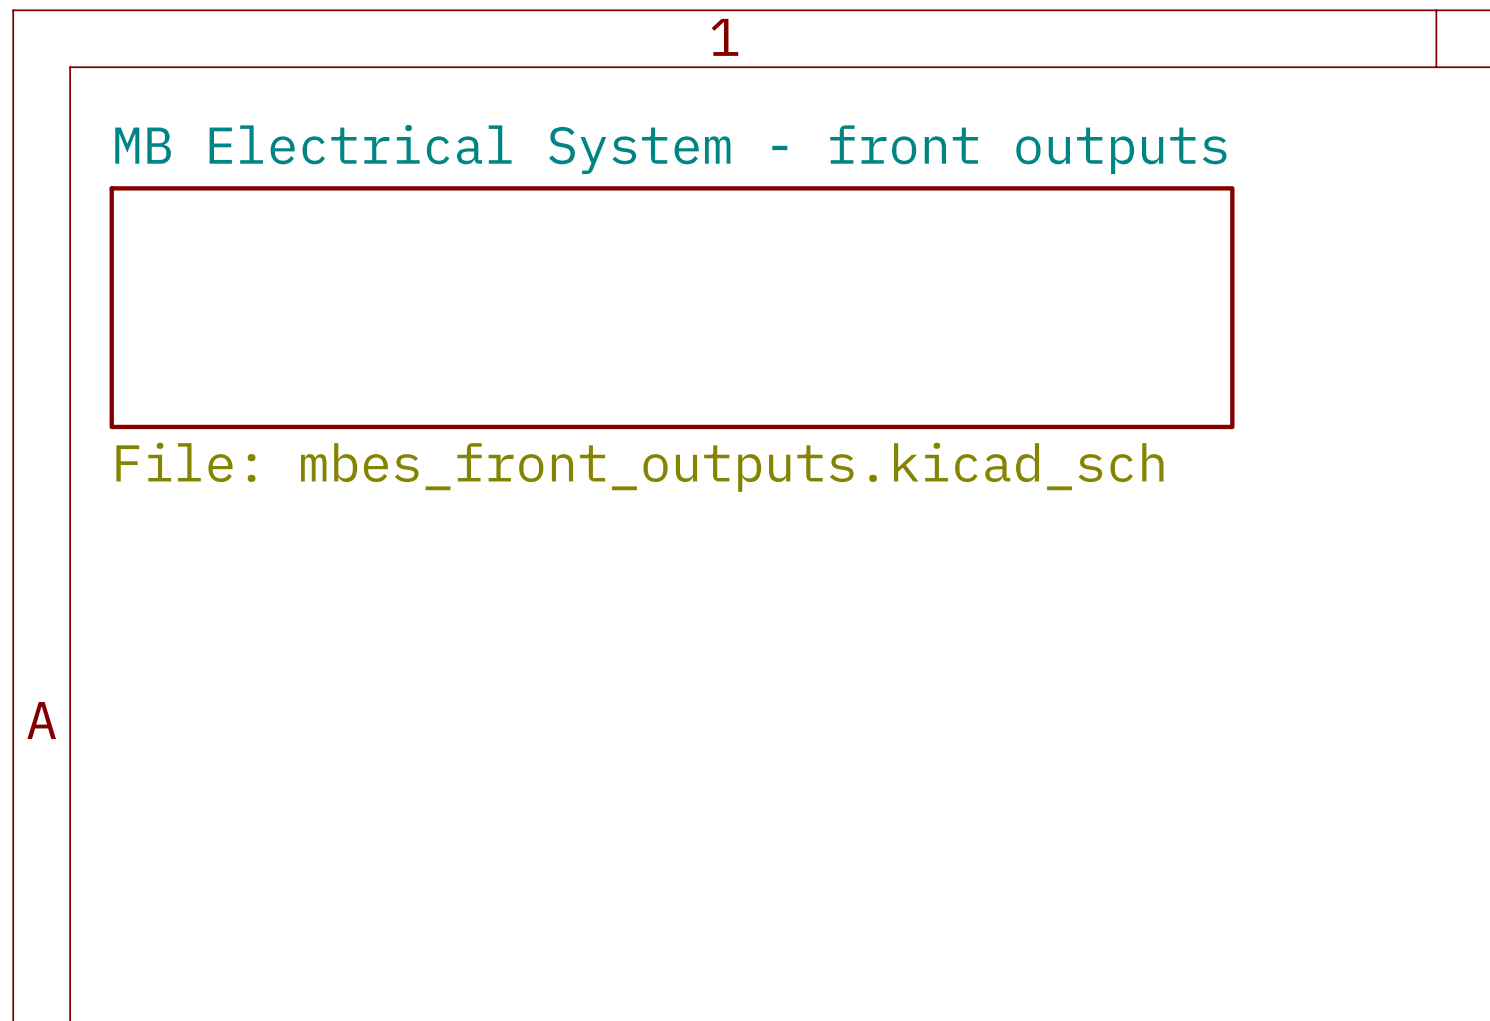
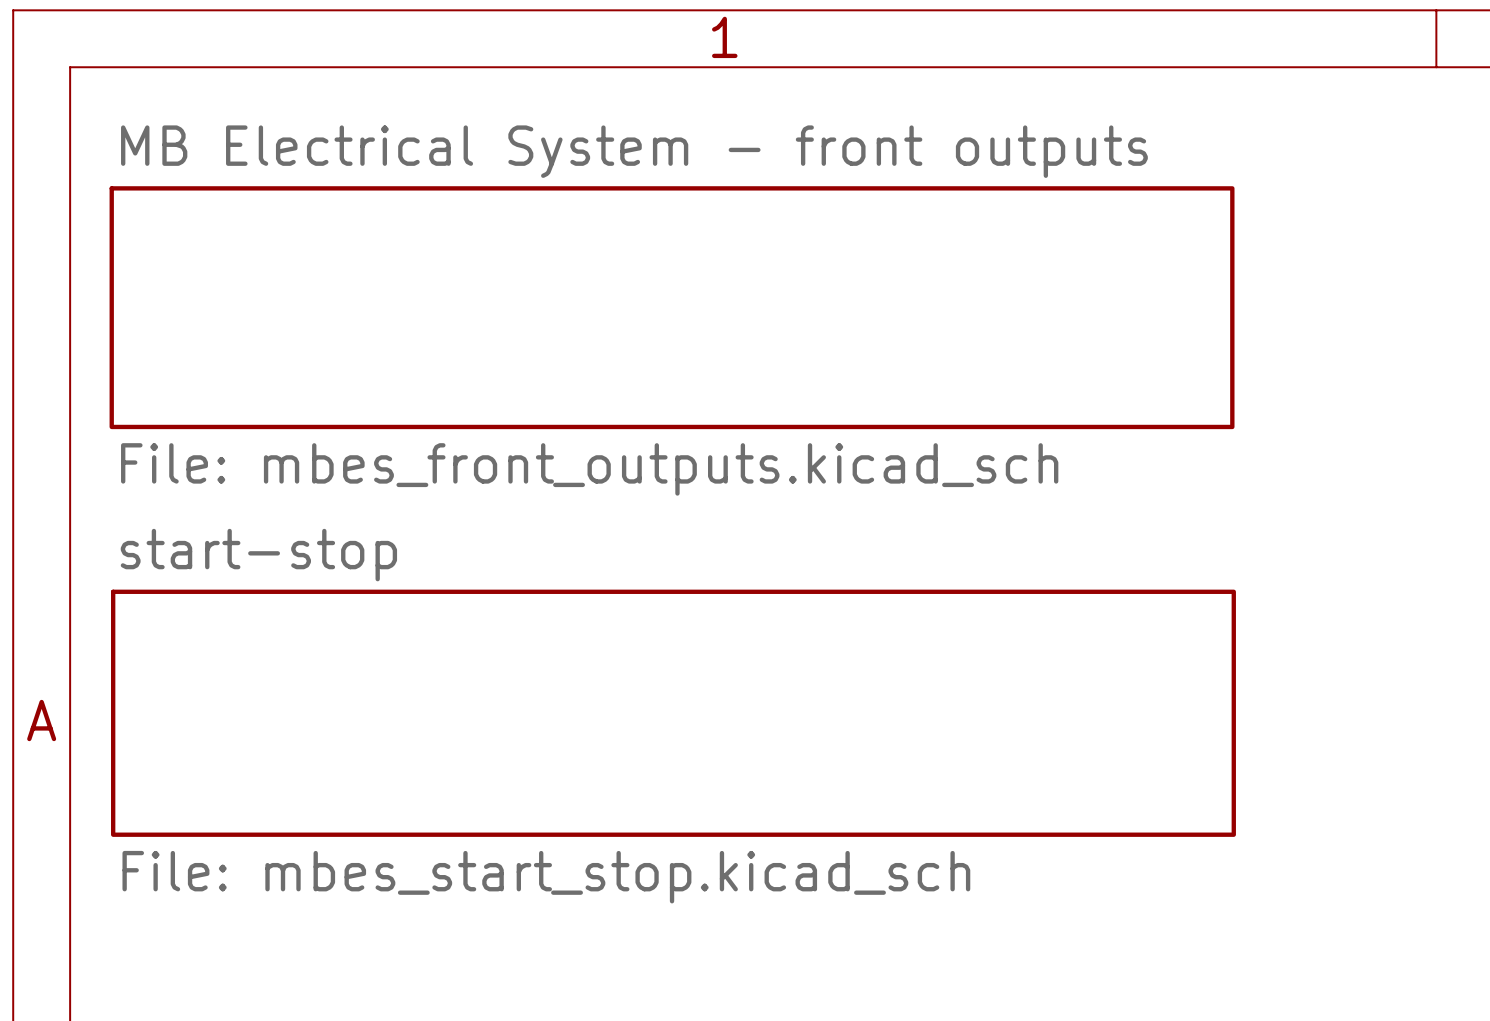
sheet start-stop: none -> File: mbes_start_stop.kicad_sch (673, 713)

